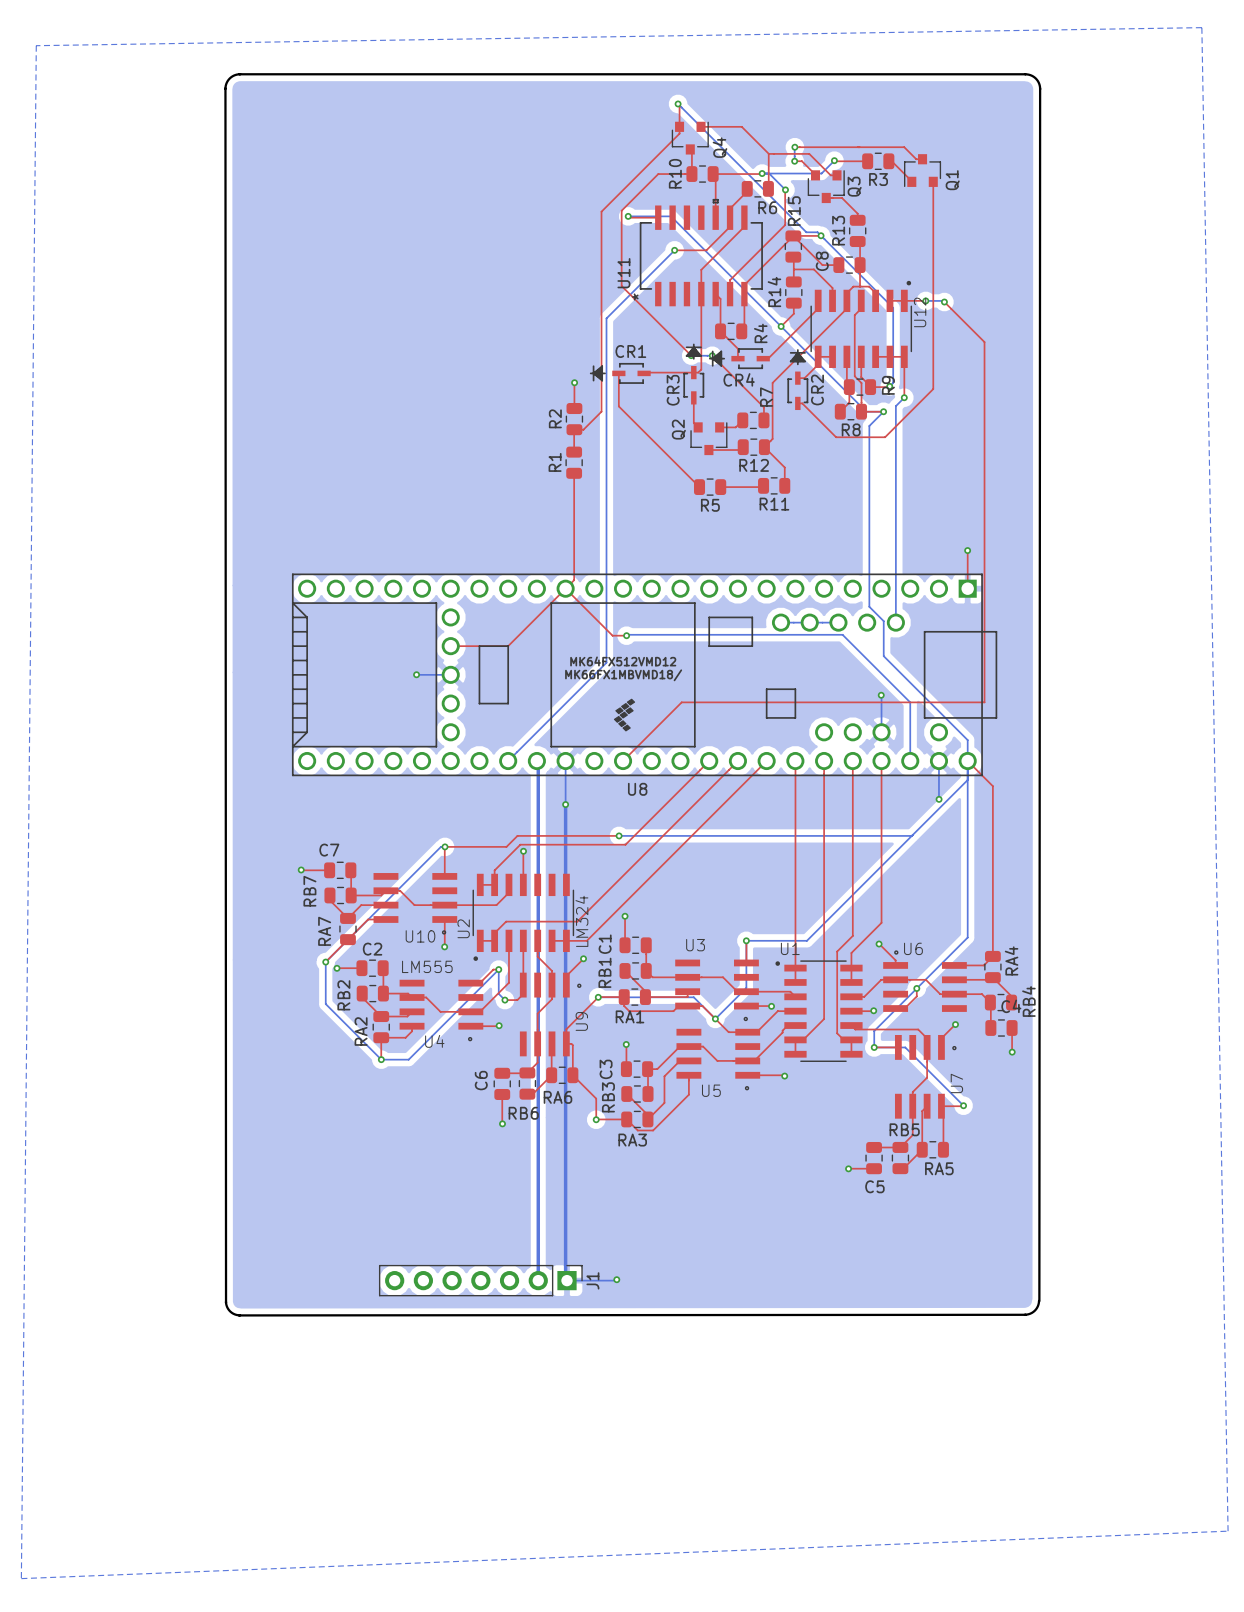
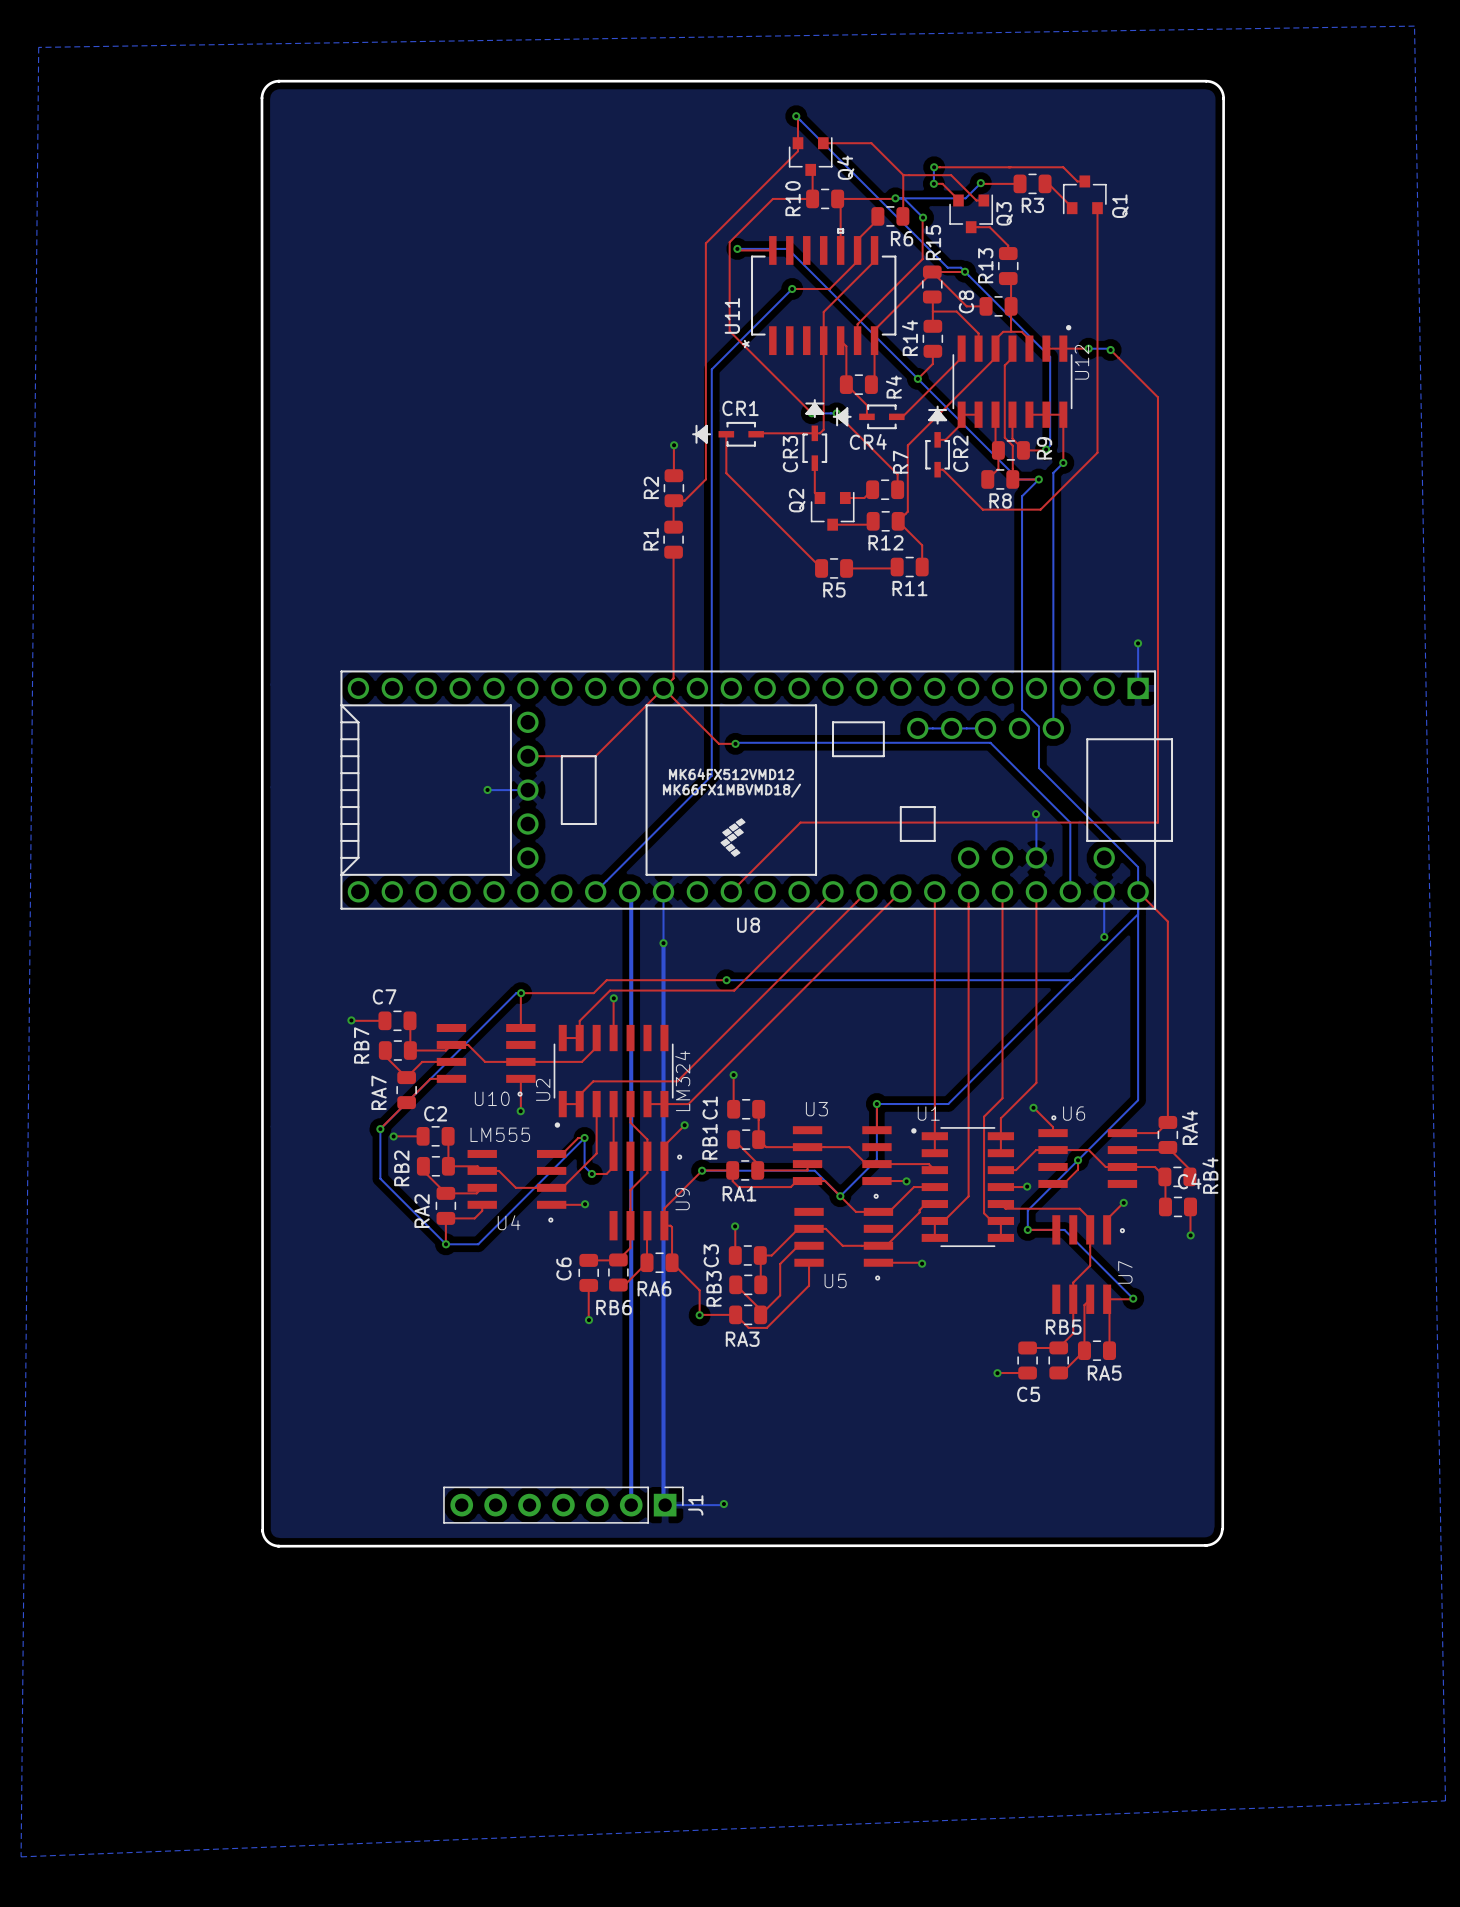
bottom track: none -> (1138, 641) (1138, 688)
top track: (967, 550) (967, 588) -> none

